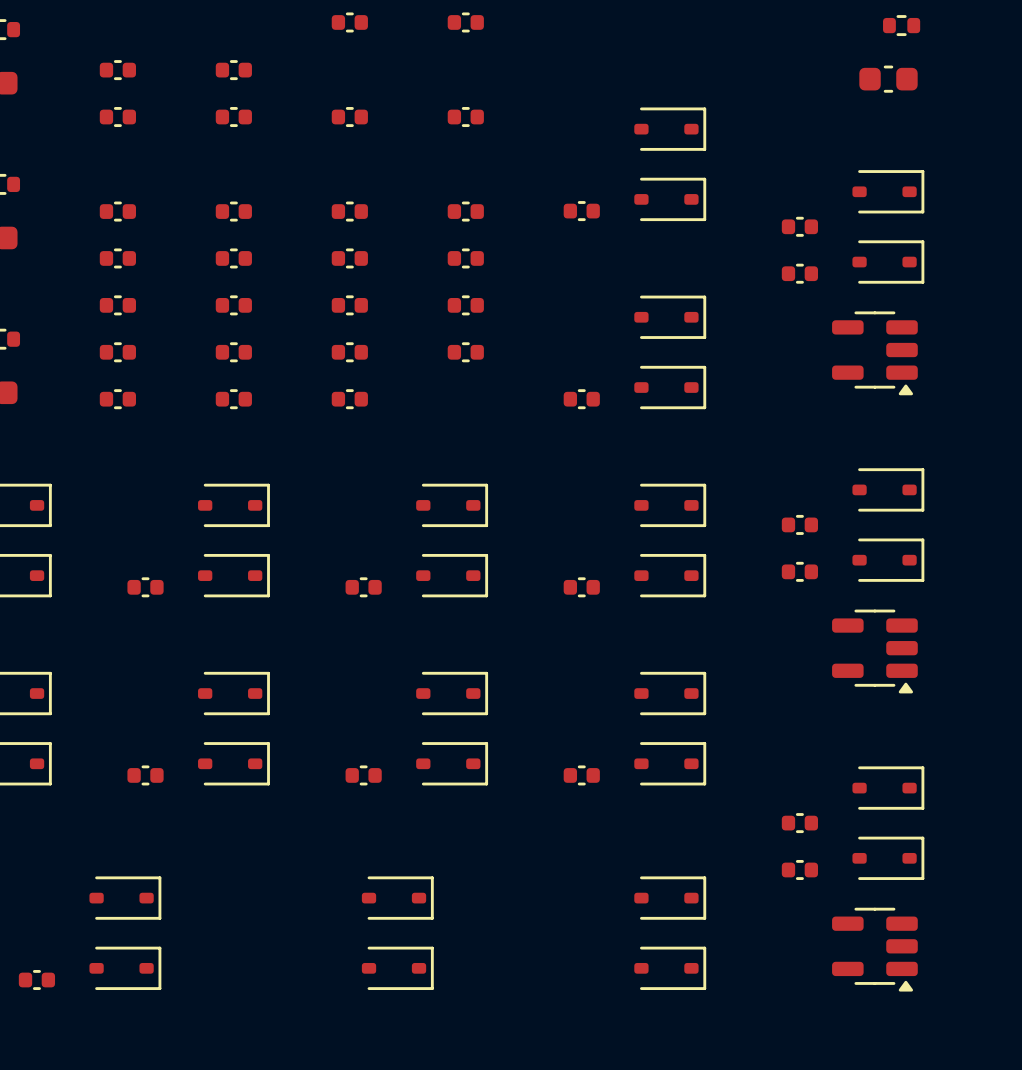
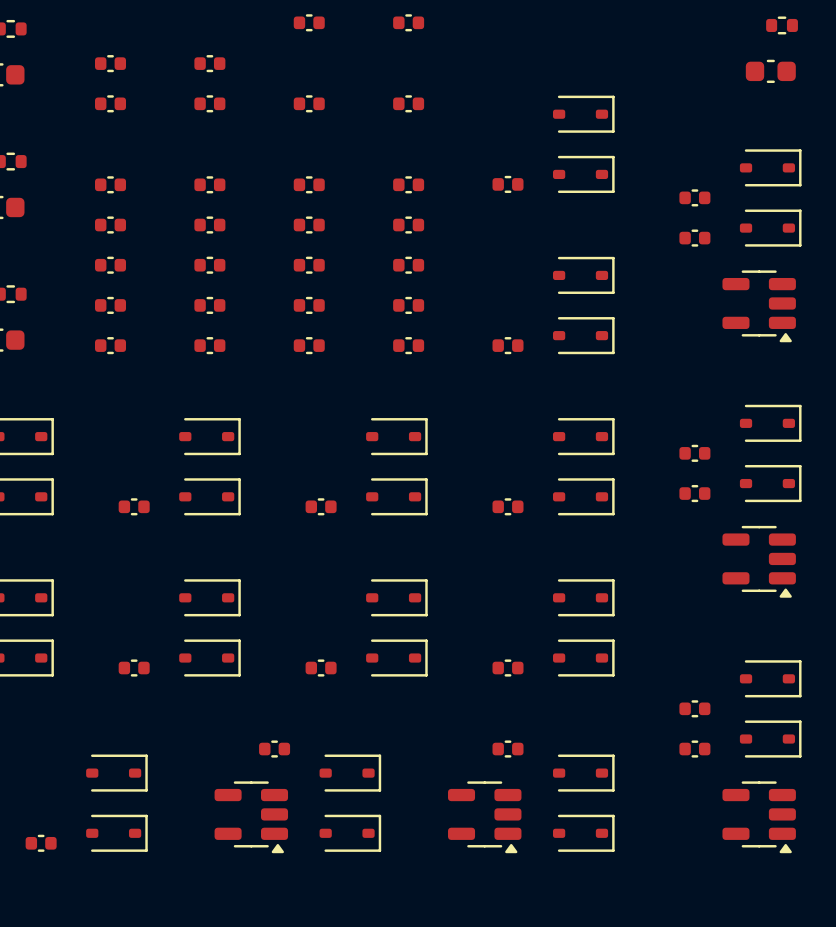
part: none -> (408, 345)
part: none -> (274, 749)
part: none -> (508, 749)
part: none -> (251, 817)
part: none -> (484, 817)

